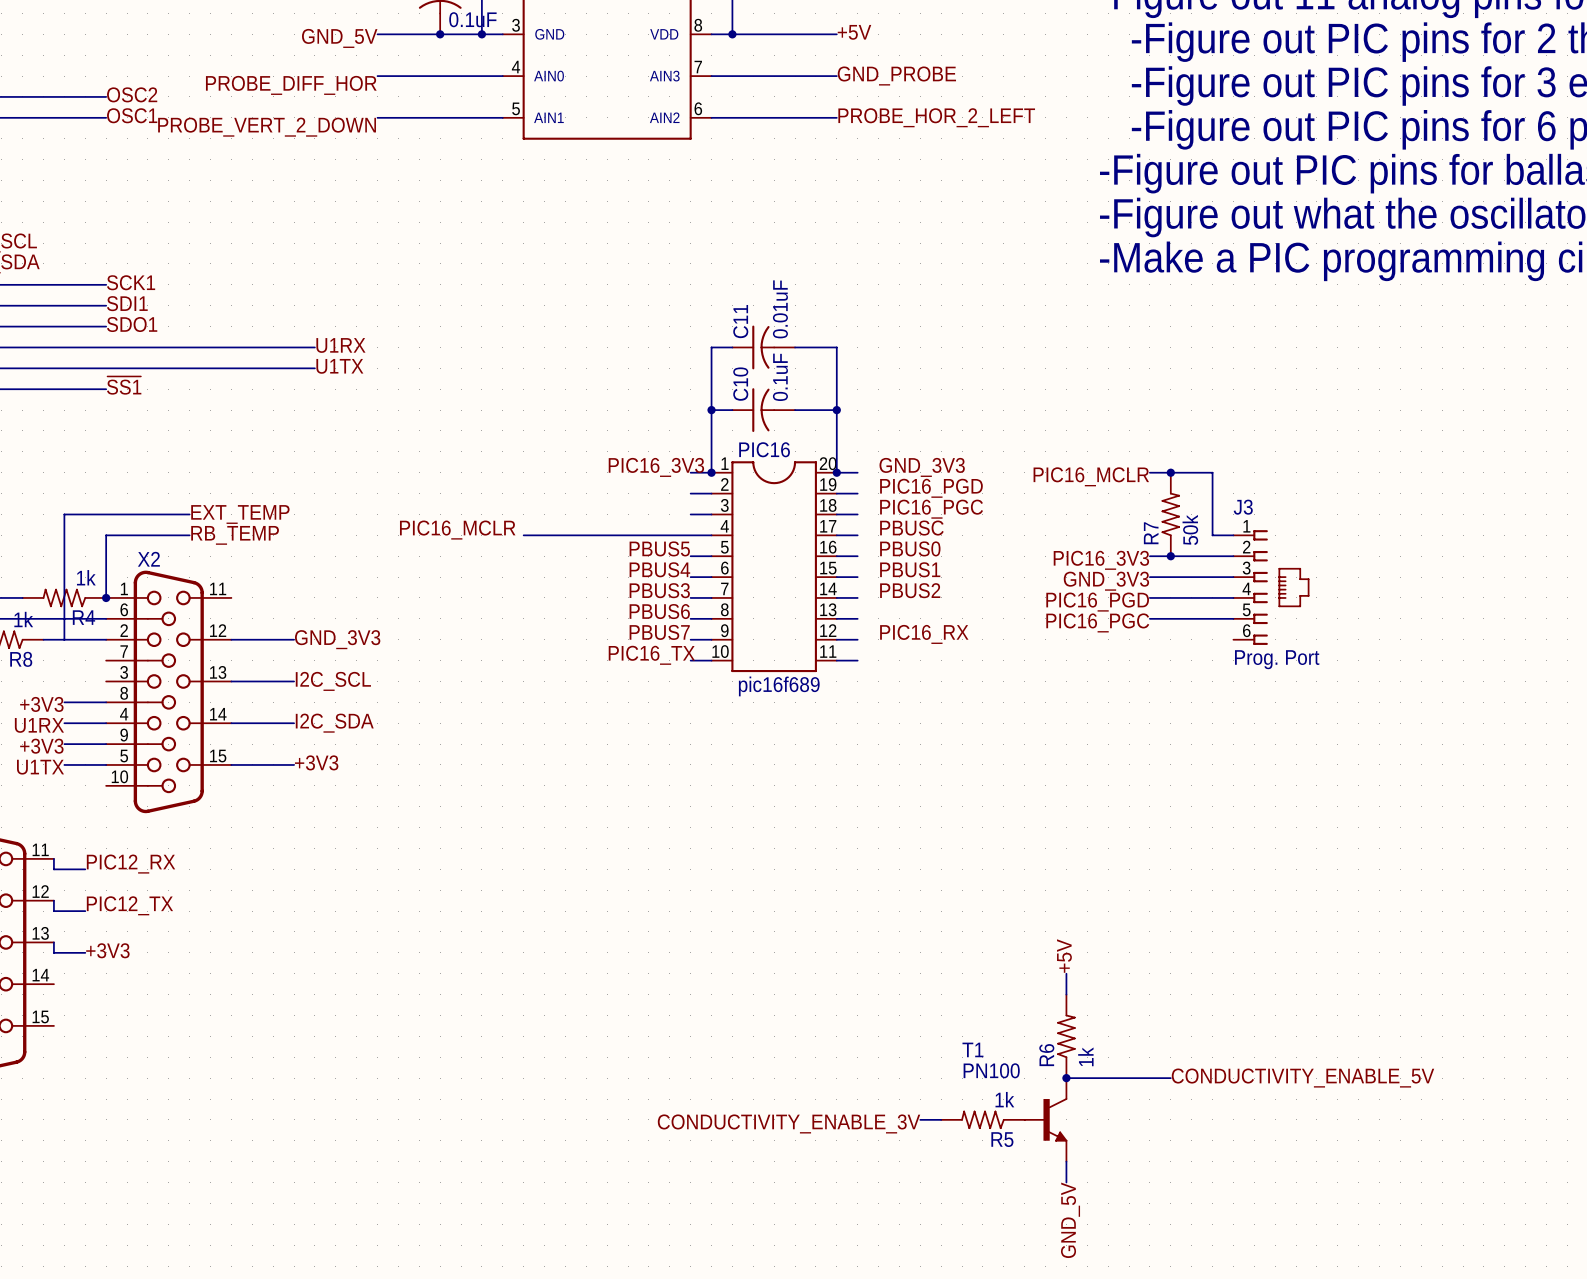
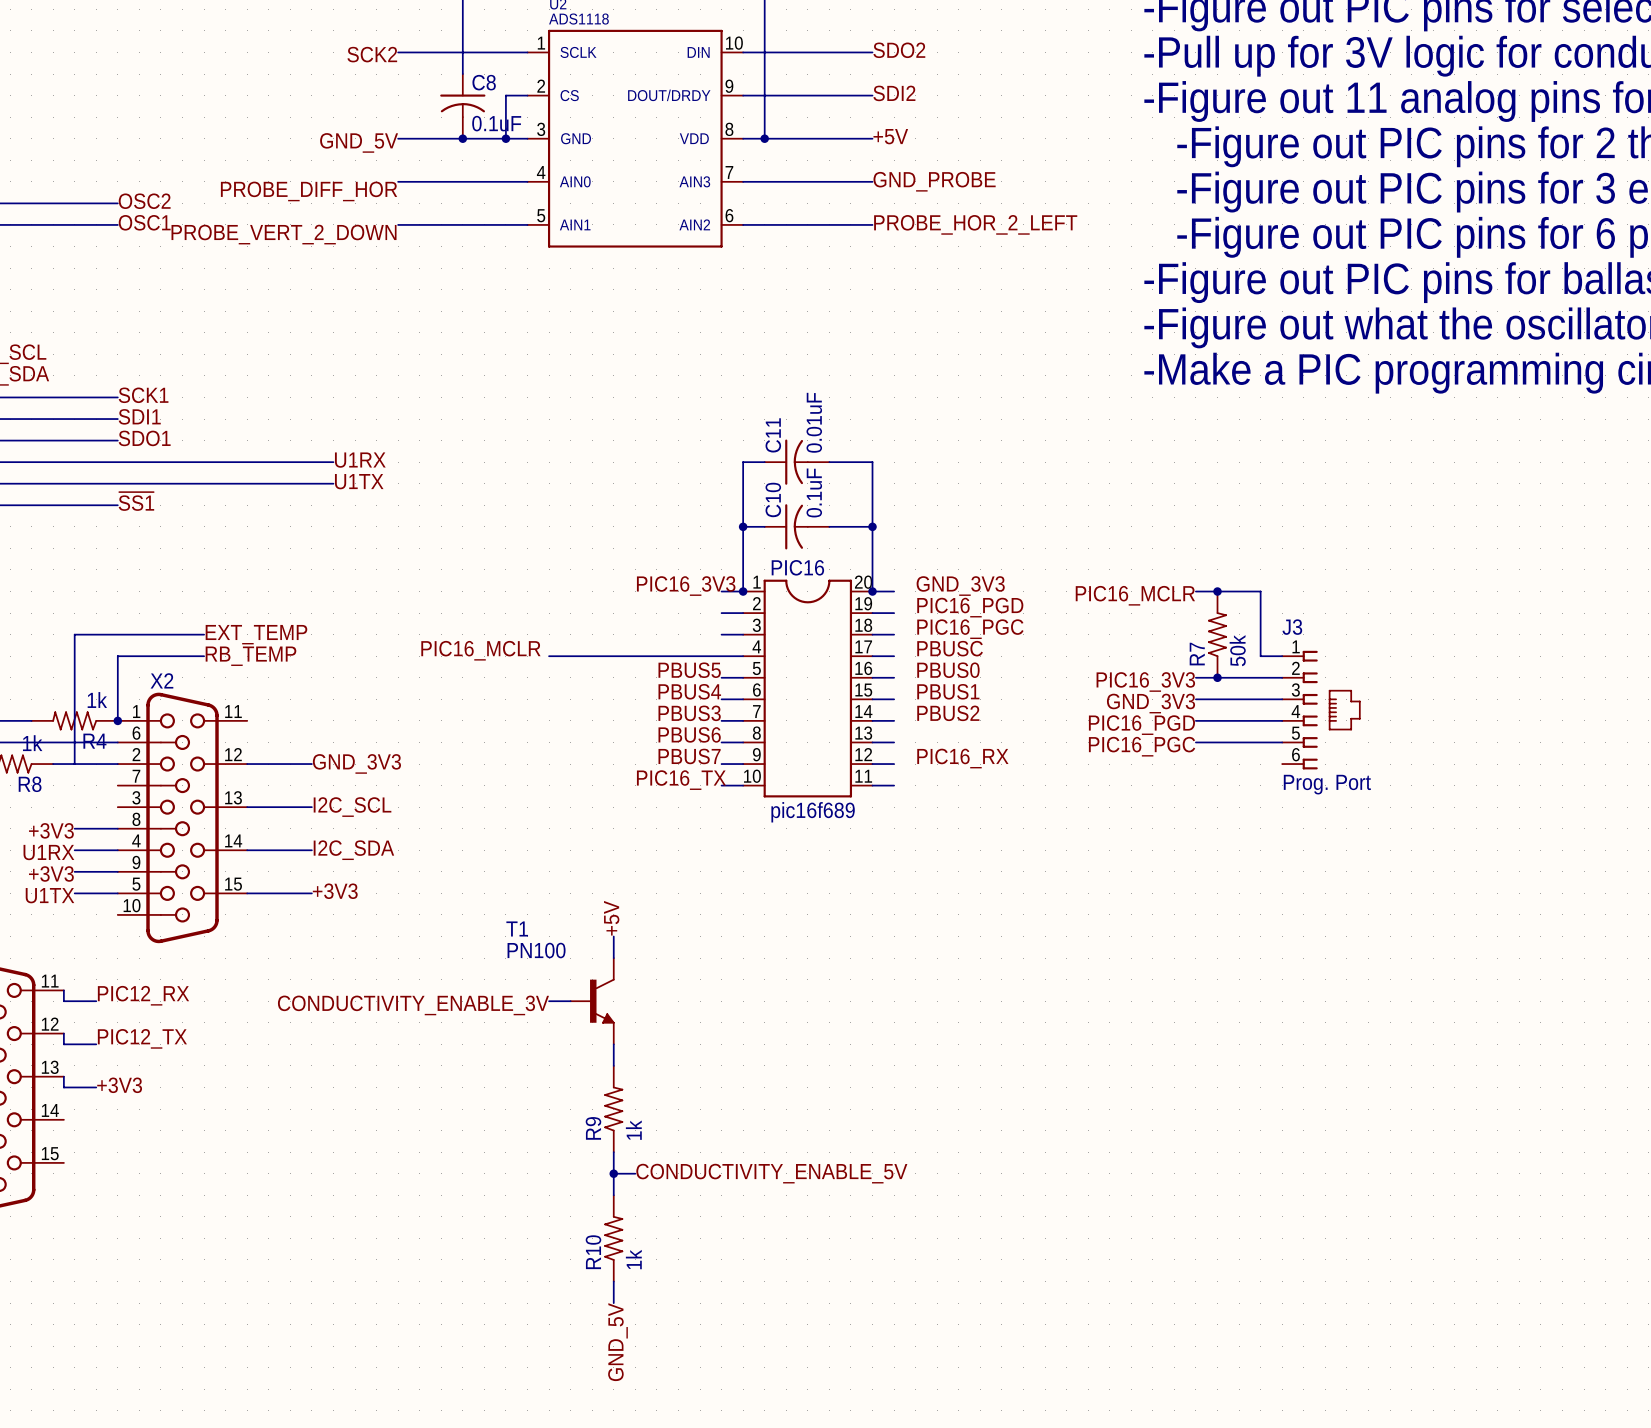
label: none -> +5V (611, 918)
wire: none -> (613, 936) (613, 958)
wire: none -> (549, 1001) (570, 1001)
label: none -> CONDUCTIVITY_ENABLE_3V (413, 1005)
wire: none -> (613, 1044) (613, 1065)
label: +5V (1064, 956) -> none
R9: none -> 1k (613, 1109)
wire: (1066, 973) (1066, 994) -> none
wire: none -> (613, 1152) (613, 1195)
wire: none -> (613, 1173) (635, 1173)
junction: none -> (613, 1173)
label: none -> CONDUCTIVITY_ENABLE_5V (771, 1173)
R6: 1k (1066, 1036) -> none
wire: (1066, 1078) (1170, 1078) -> none
junction: (1066, 1078) -> none
label: CONDUCTIVITY_ENABLE_5V (1302, 1078) -> none
R10: none -> 1k (613, 1238)
wire: (920, 1119) (941, 1119) -> none
R5: 1k (982, 1119) -> none
T1 position: (1045, 1119) -> (592, 1001)
label: CONDUCTIVITY_ENABLE_3V (789, 1123) -> none
wire: none -> (613, 1281) (613, 1303)
wire: (1066, 1161) (1066, 1182) -> none
label: none -> GND_5V (617, 1342)
label: GND_5V (1070, 1220) -> none

